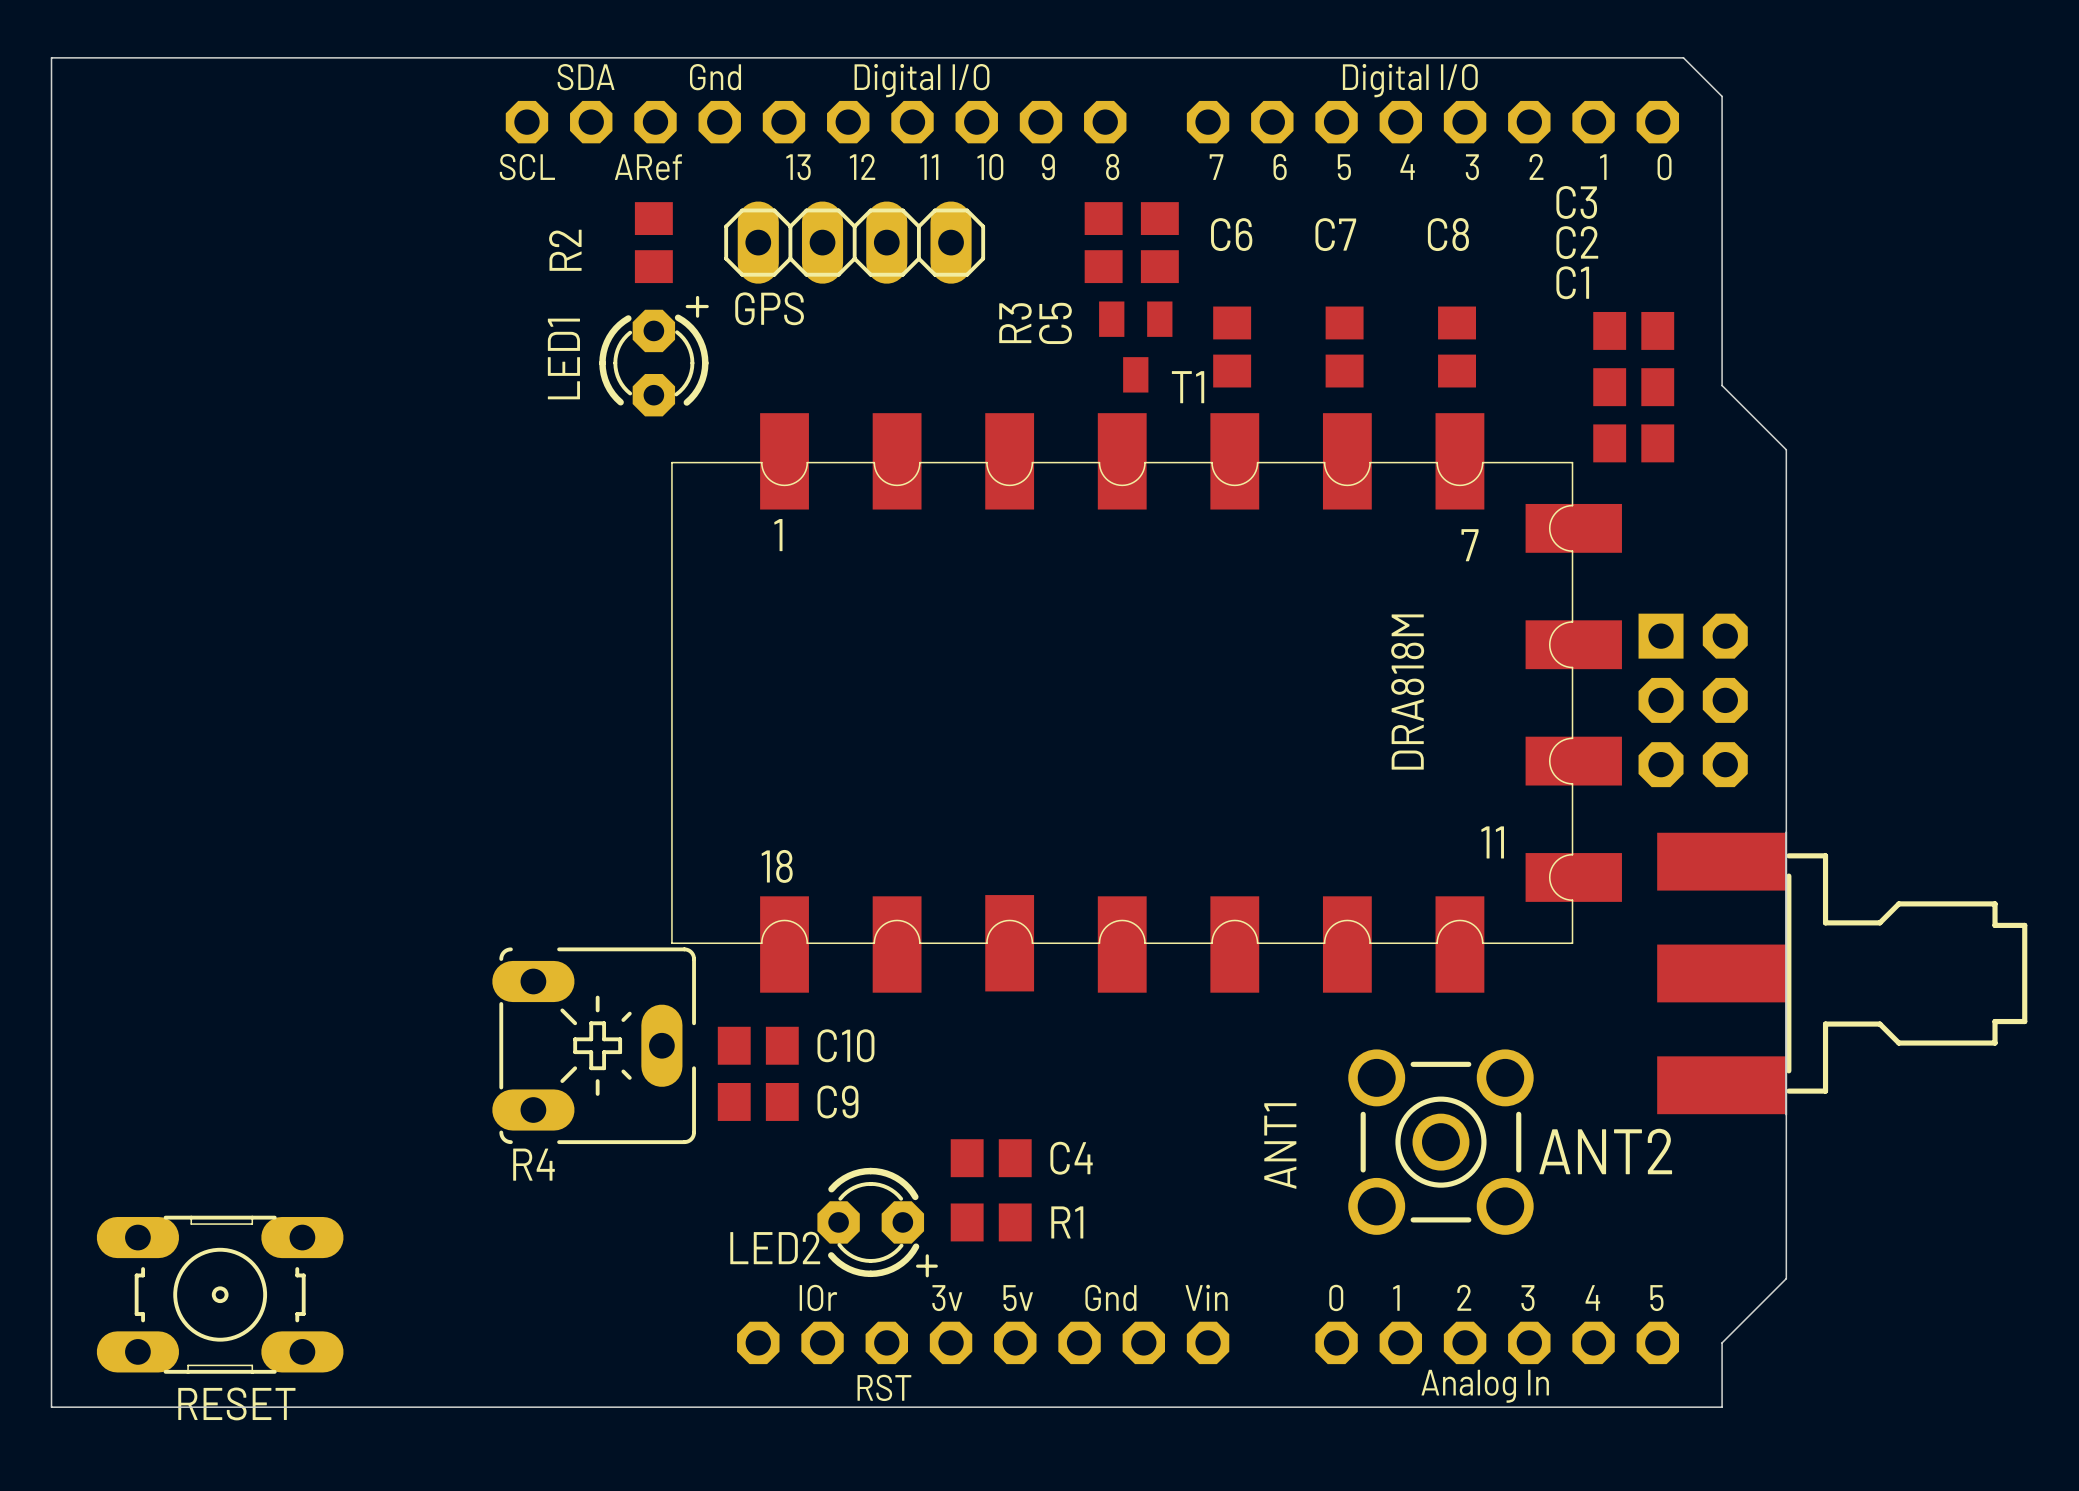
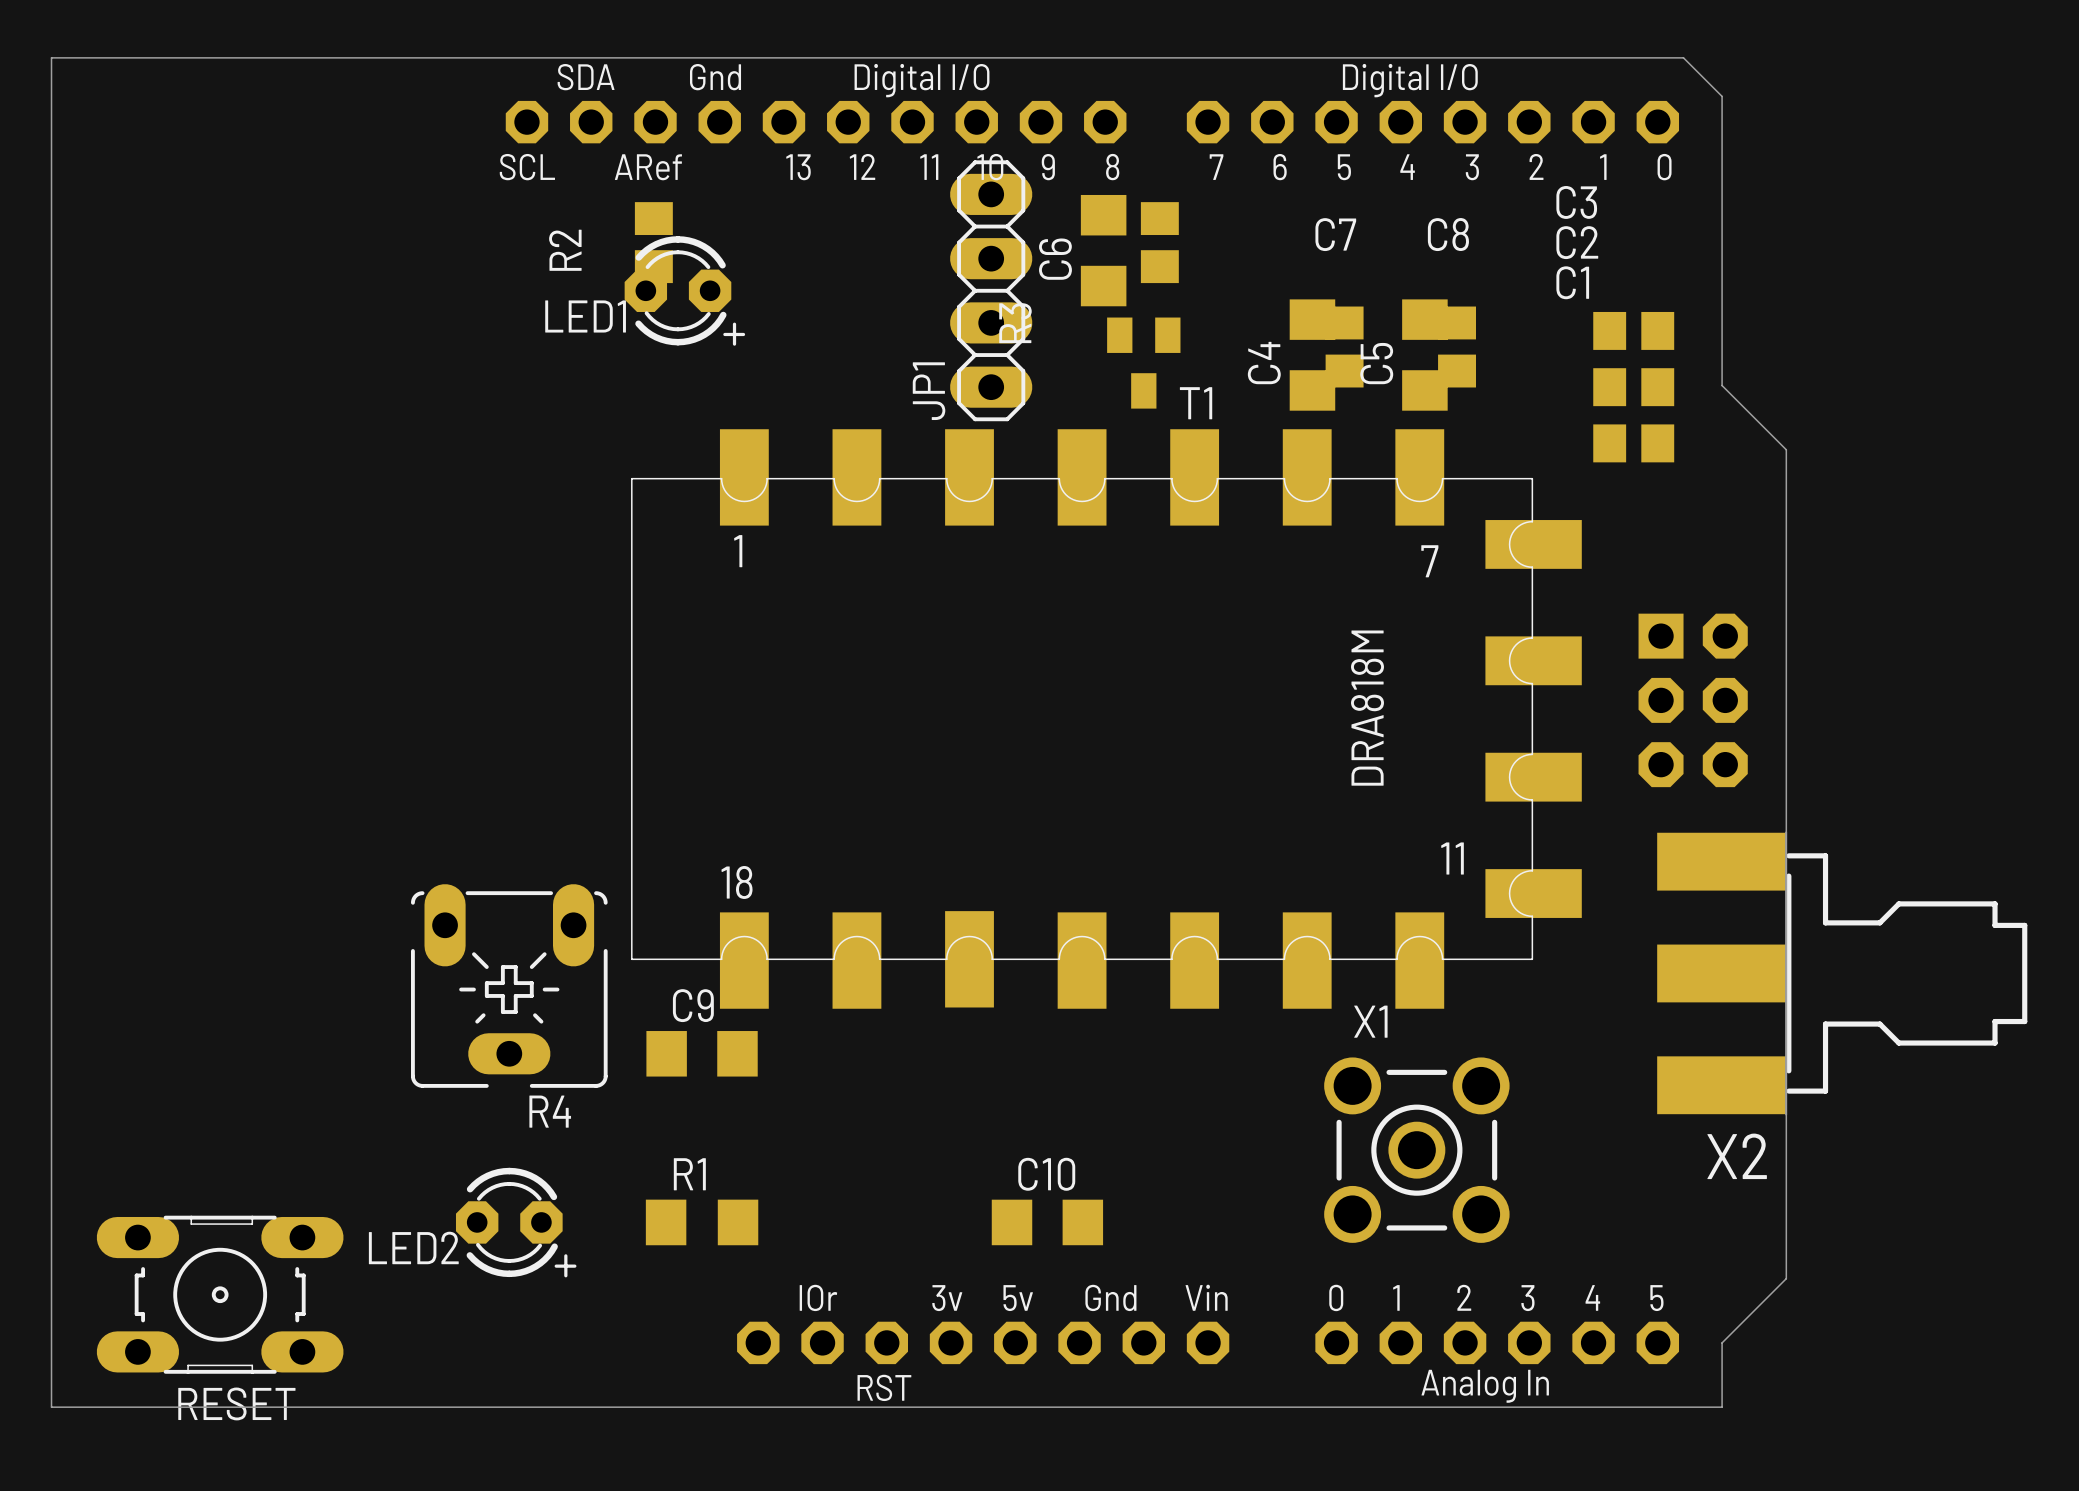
C5 footprint: [1084, 202, 1123, 284] -> [1402, 299, 1448, 411]
C6 name position: C6 (1231, 234) -> C6 (1055, 259)
GPS: (854, 242) -> none
JP1: none -> (991, 290)
C6 footprint: [1213, 306, 1252, 388] -> [1080, 194, 1127, 307]
C5 name position: C5 (1055, 323) -> C5 (1376, 363)
T1 position: (1135, 347) -> (1143, 363)
LED1 rotation: 0° (654, 356) -> 90° clockwise (684, 290)
LED1 name position: LED1 (563, 358) -> LED1 (585, 316)
part position: (1146, 702) -> (1106, 718)
C10 footprint: [717, 1026, 799, 1065] -> [991, 1199, 1104, 1246]
R4 rotation: 0° (594, 1045) -> 90° clockwise (509, 985)
C10 name position: C10 (845, 1045) -> C10 (1046, 1174)
C9 footprint: [717, 1083, 799, 1121] -> [646, 1031, 758, 1077]
C9 name position: C9 (837, 1102) -> C9 (693, 1005)
C4 footprint: [950, 1139, 1032, 1178] -> [1289, 299, 1336, 411]
ANT1: (1440, 1142) -> none
X1: none -> (1416, 1150)
ANT2 name: ANT2 (1605, 1151) -> X2 (1737, 1156)
C4 name position: C4 (1071, 1158) -> C4 (1264, 363)
R4 name position: R4 (534, 1164) -> R4 (550, 1111)
R1 footprint: [950, 1203, 1032, 1242] -> [645, 1199, 759, 1246]
LED2 position: (877, 1222) -> (516, 1222)
R1 name position: R1 (1067, 1222) -> R1 (689, 1174)

